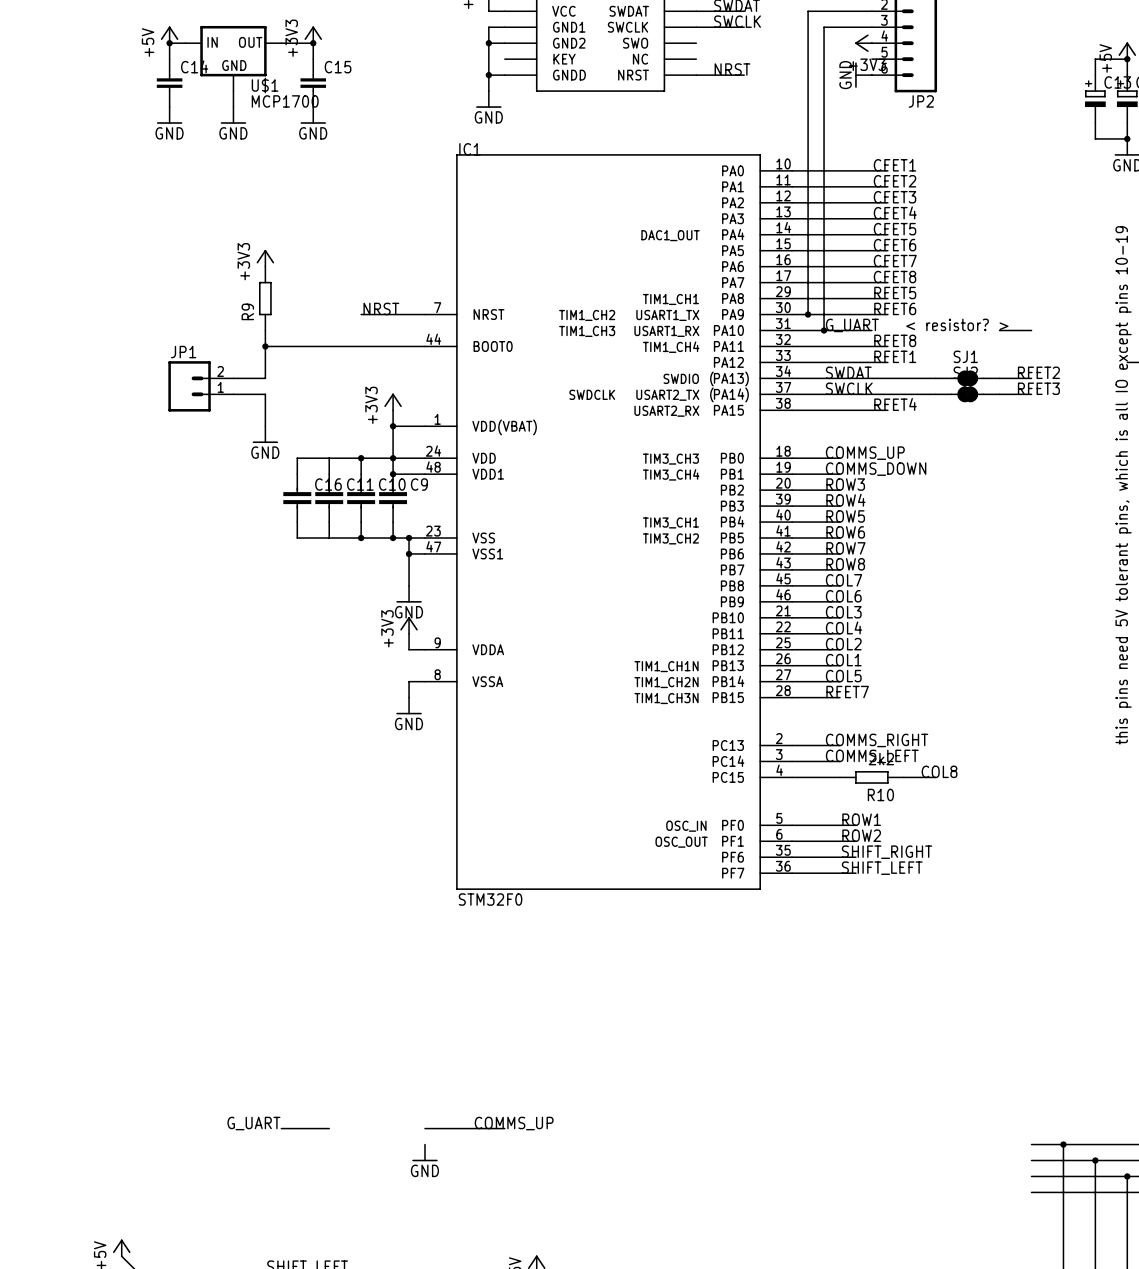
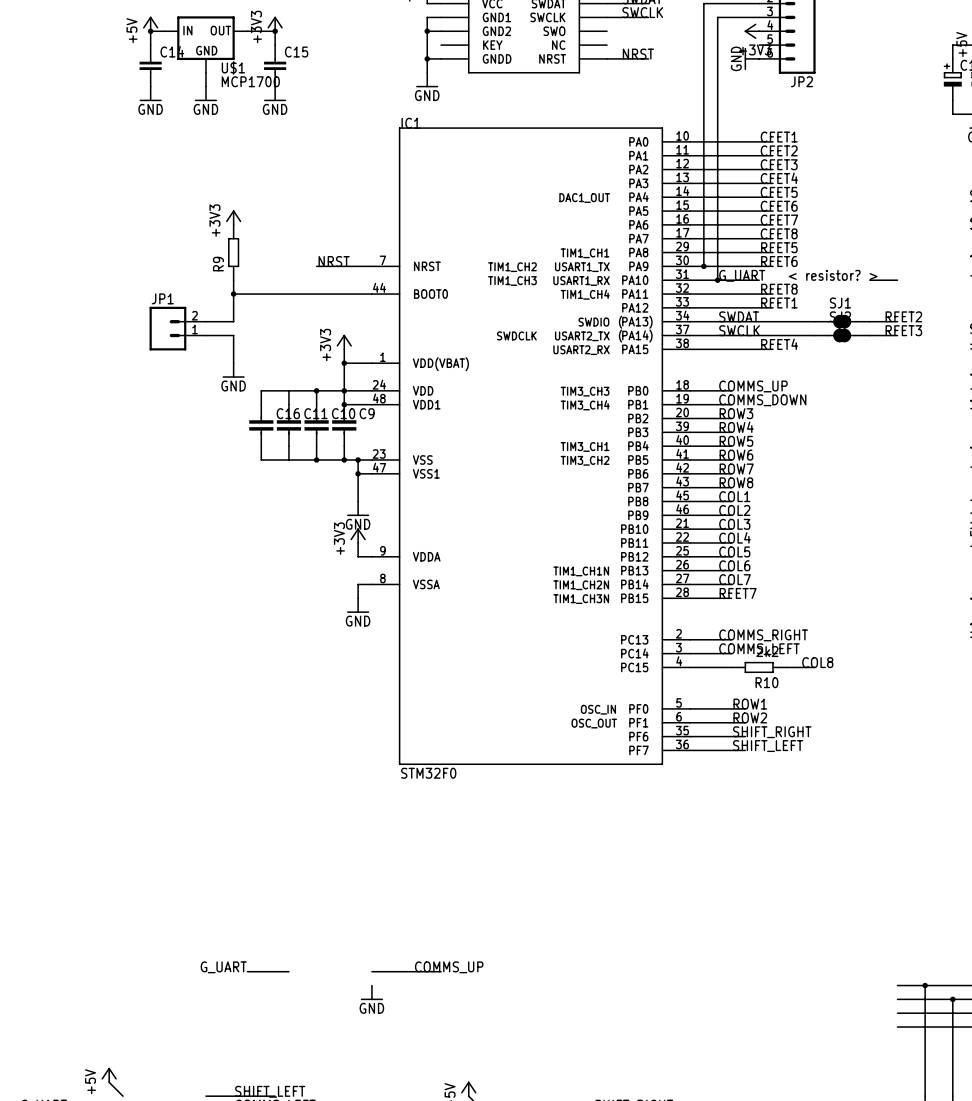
label: COL7 (844, 580) -> COL1 (734, 496)
label: COL6 (843, 596) -> COL2 (734, 510)
label: COL2 (843, 644) -> COL5 (734, 551)
label: COL1 (843, 660) -> COL6 (734, 565)
label: COL5 (843, 676) -> COL7 (735, 579)

